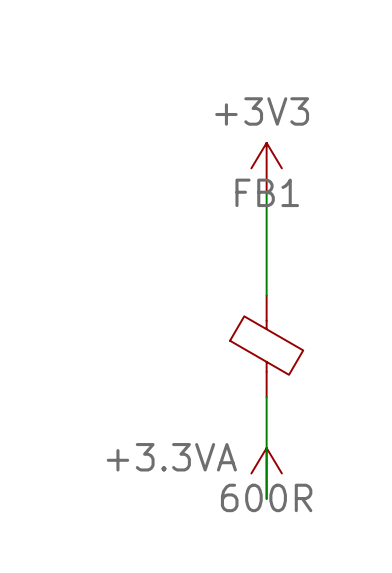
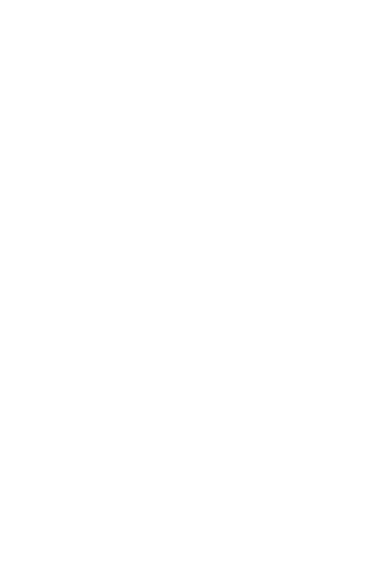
power symbol: +3V3 (266, 168) -> none
wire: (266, 193) (266, 295) -> none
FB1: 600R (266, 346) -> none
wire: (266, 397) (266, 498) -> none
power symbol: +3.3VA (266, 473) -> none

